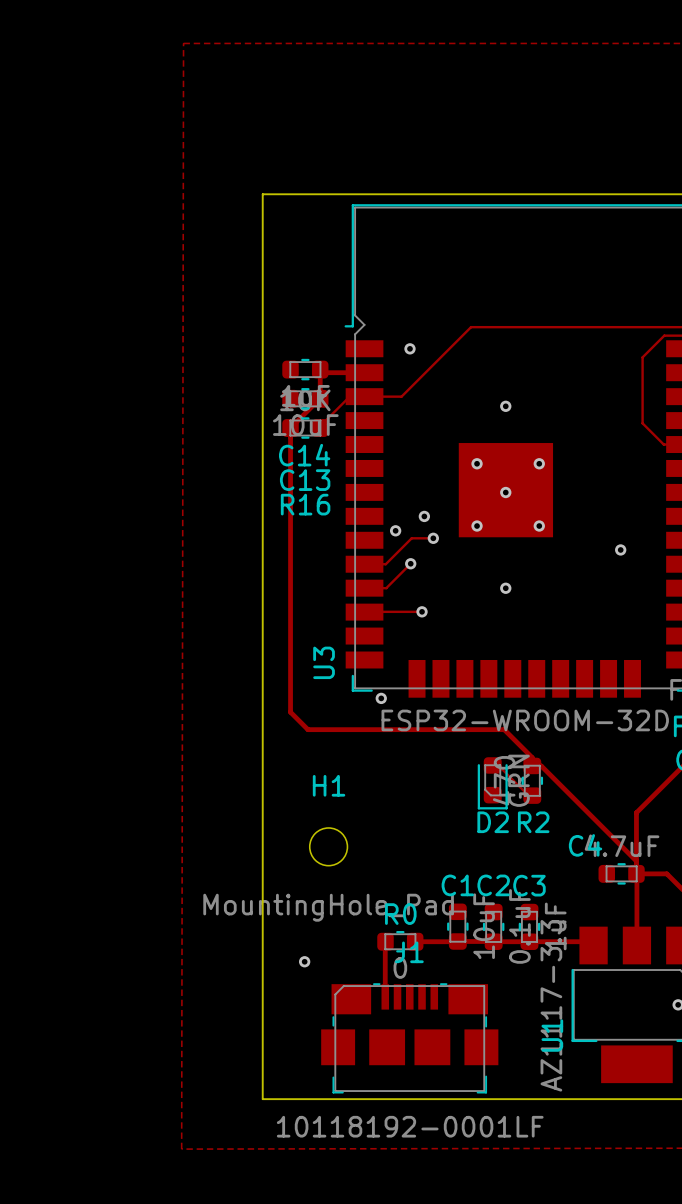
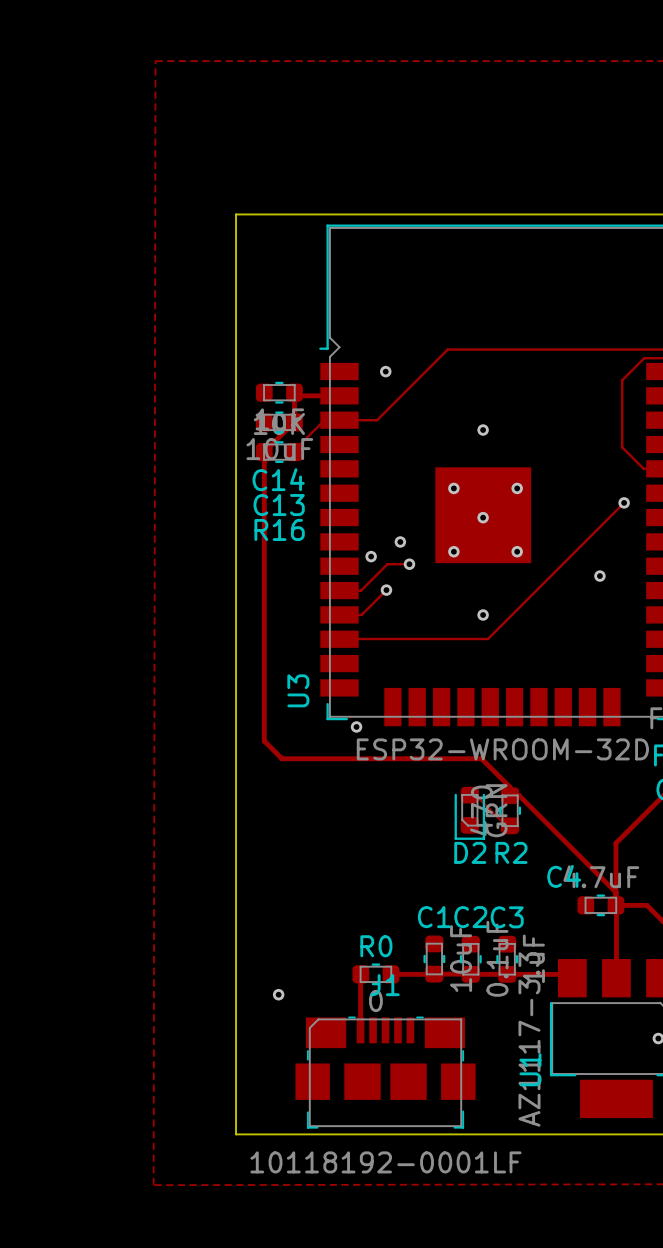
track: none -> (624, 502) (488, 638) (397, 638)
via: none -> (624, 502)
via: (422, 611) -> none
H1: MountingHole_Pad (328, 846) -> none

